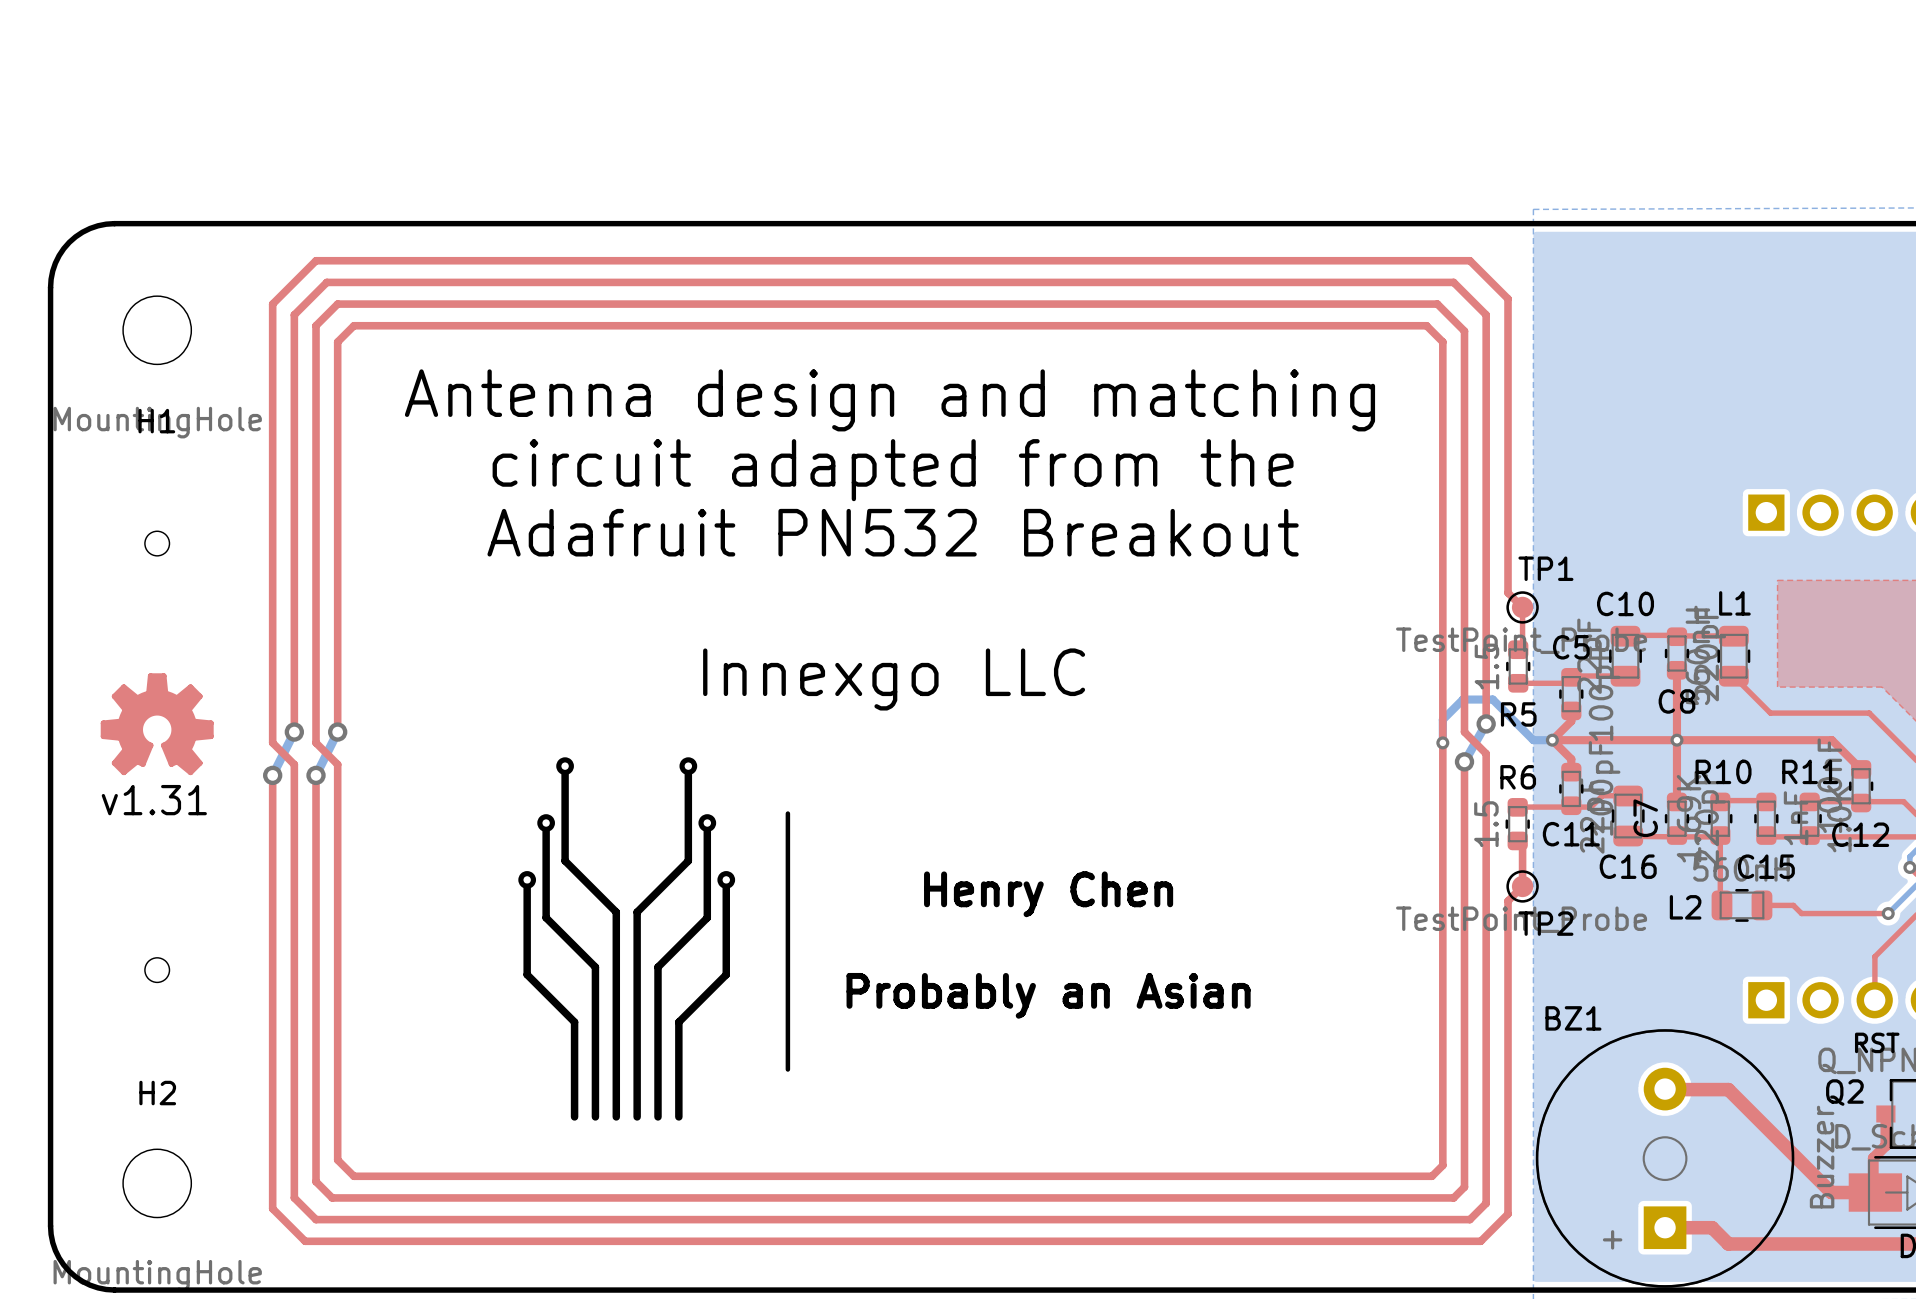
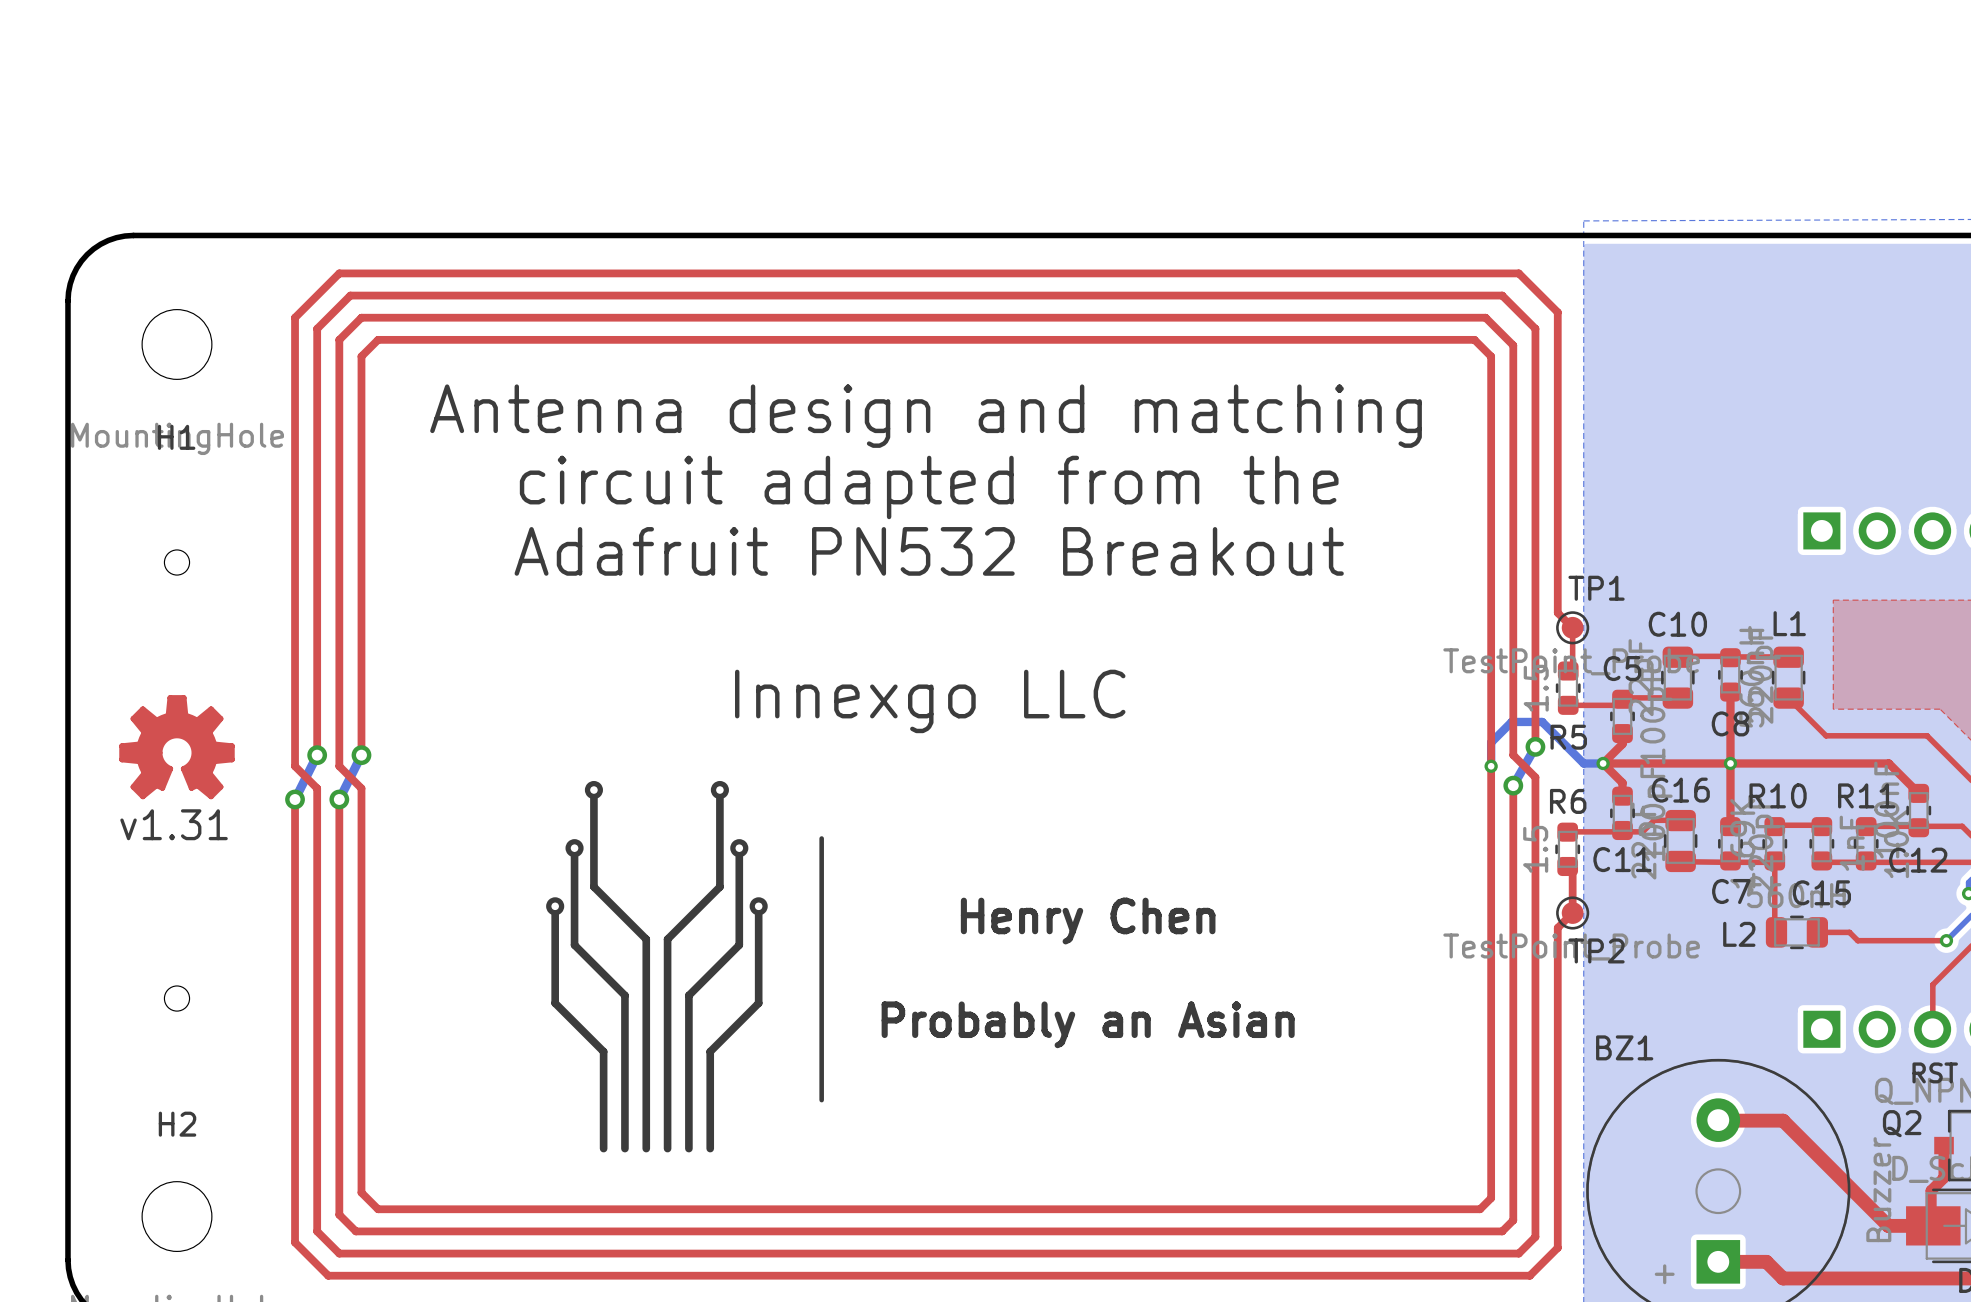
C7 name rotation: 0° (1645, 818) -> 90° clockwise (1731, 891)
C7 name position: C7 (1645, 818) -> C7 (1731, 891)
C16 name position: C16 (1628, 866) -> C16 (1680, 790)

